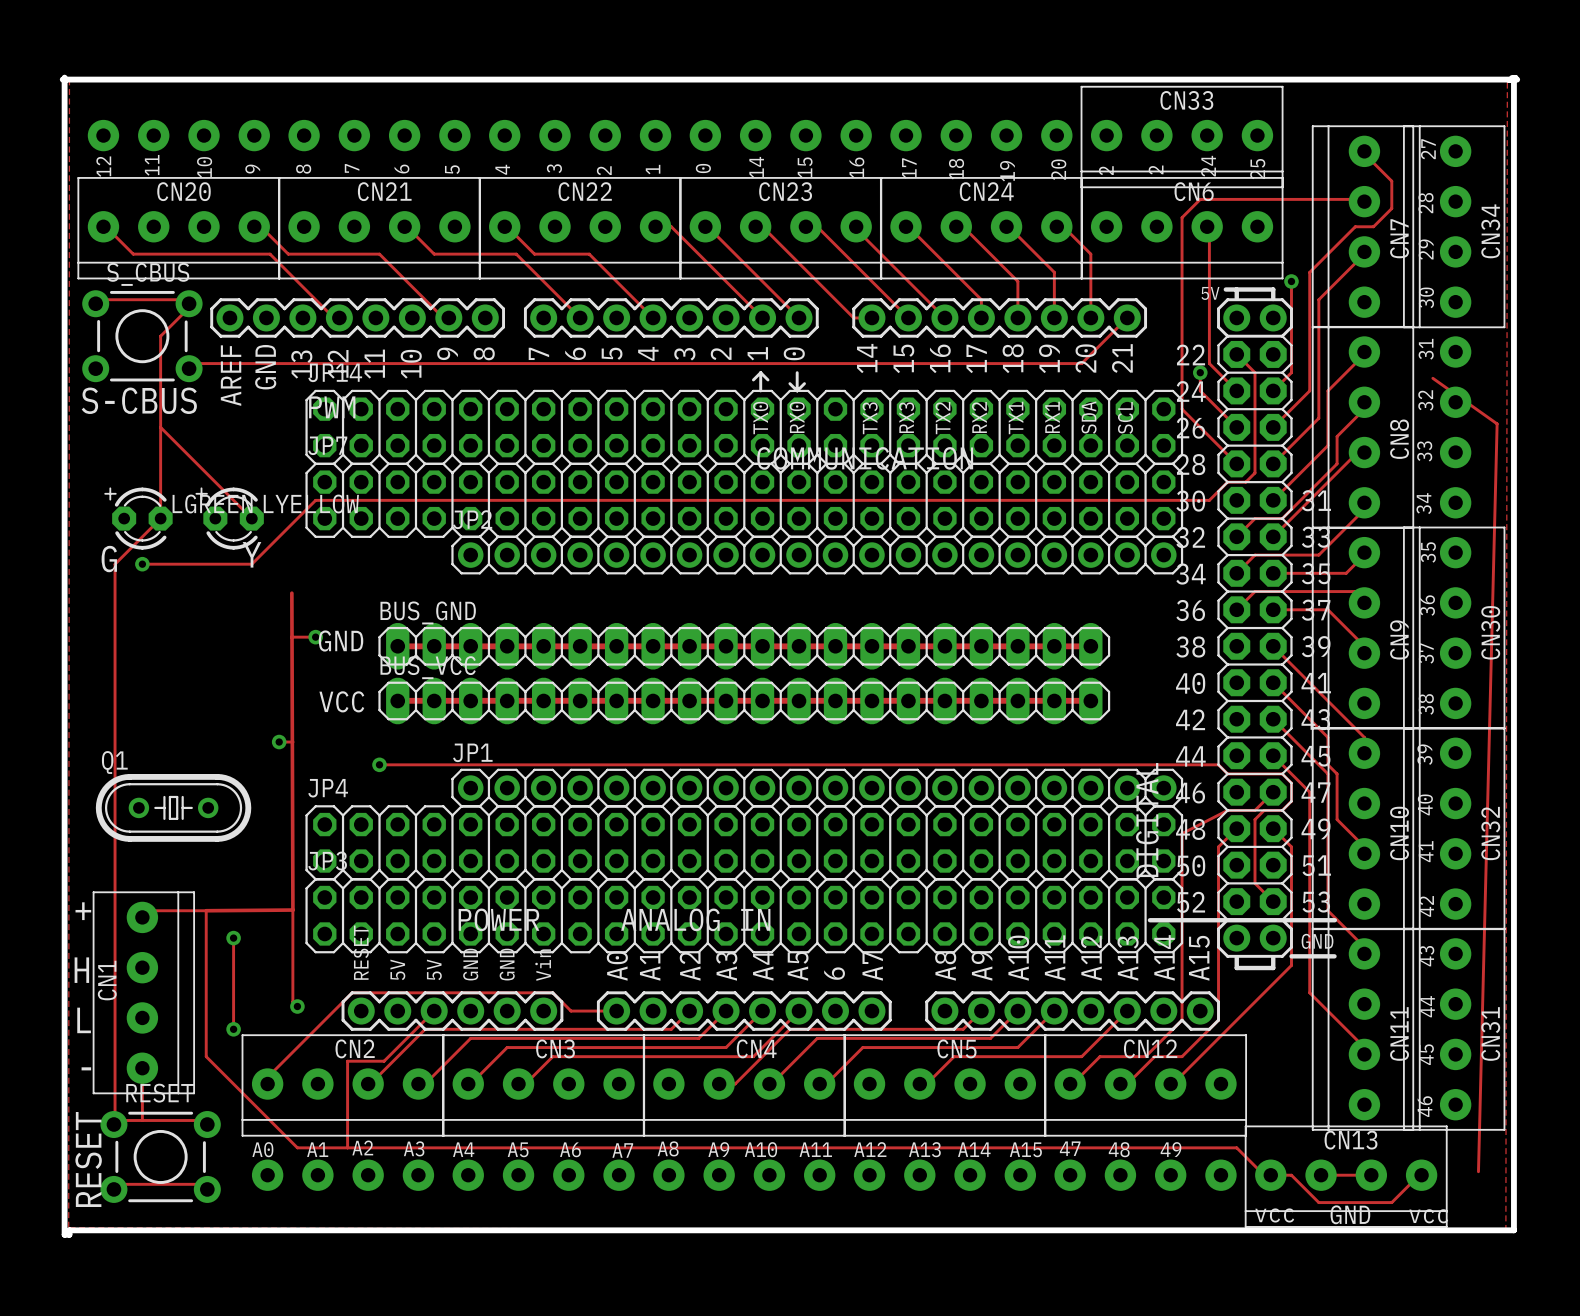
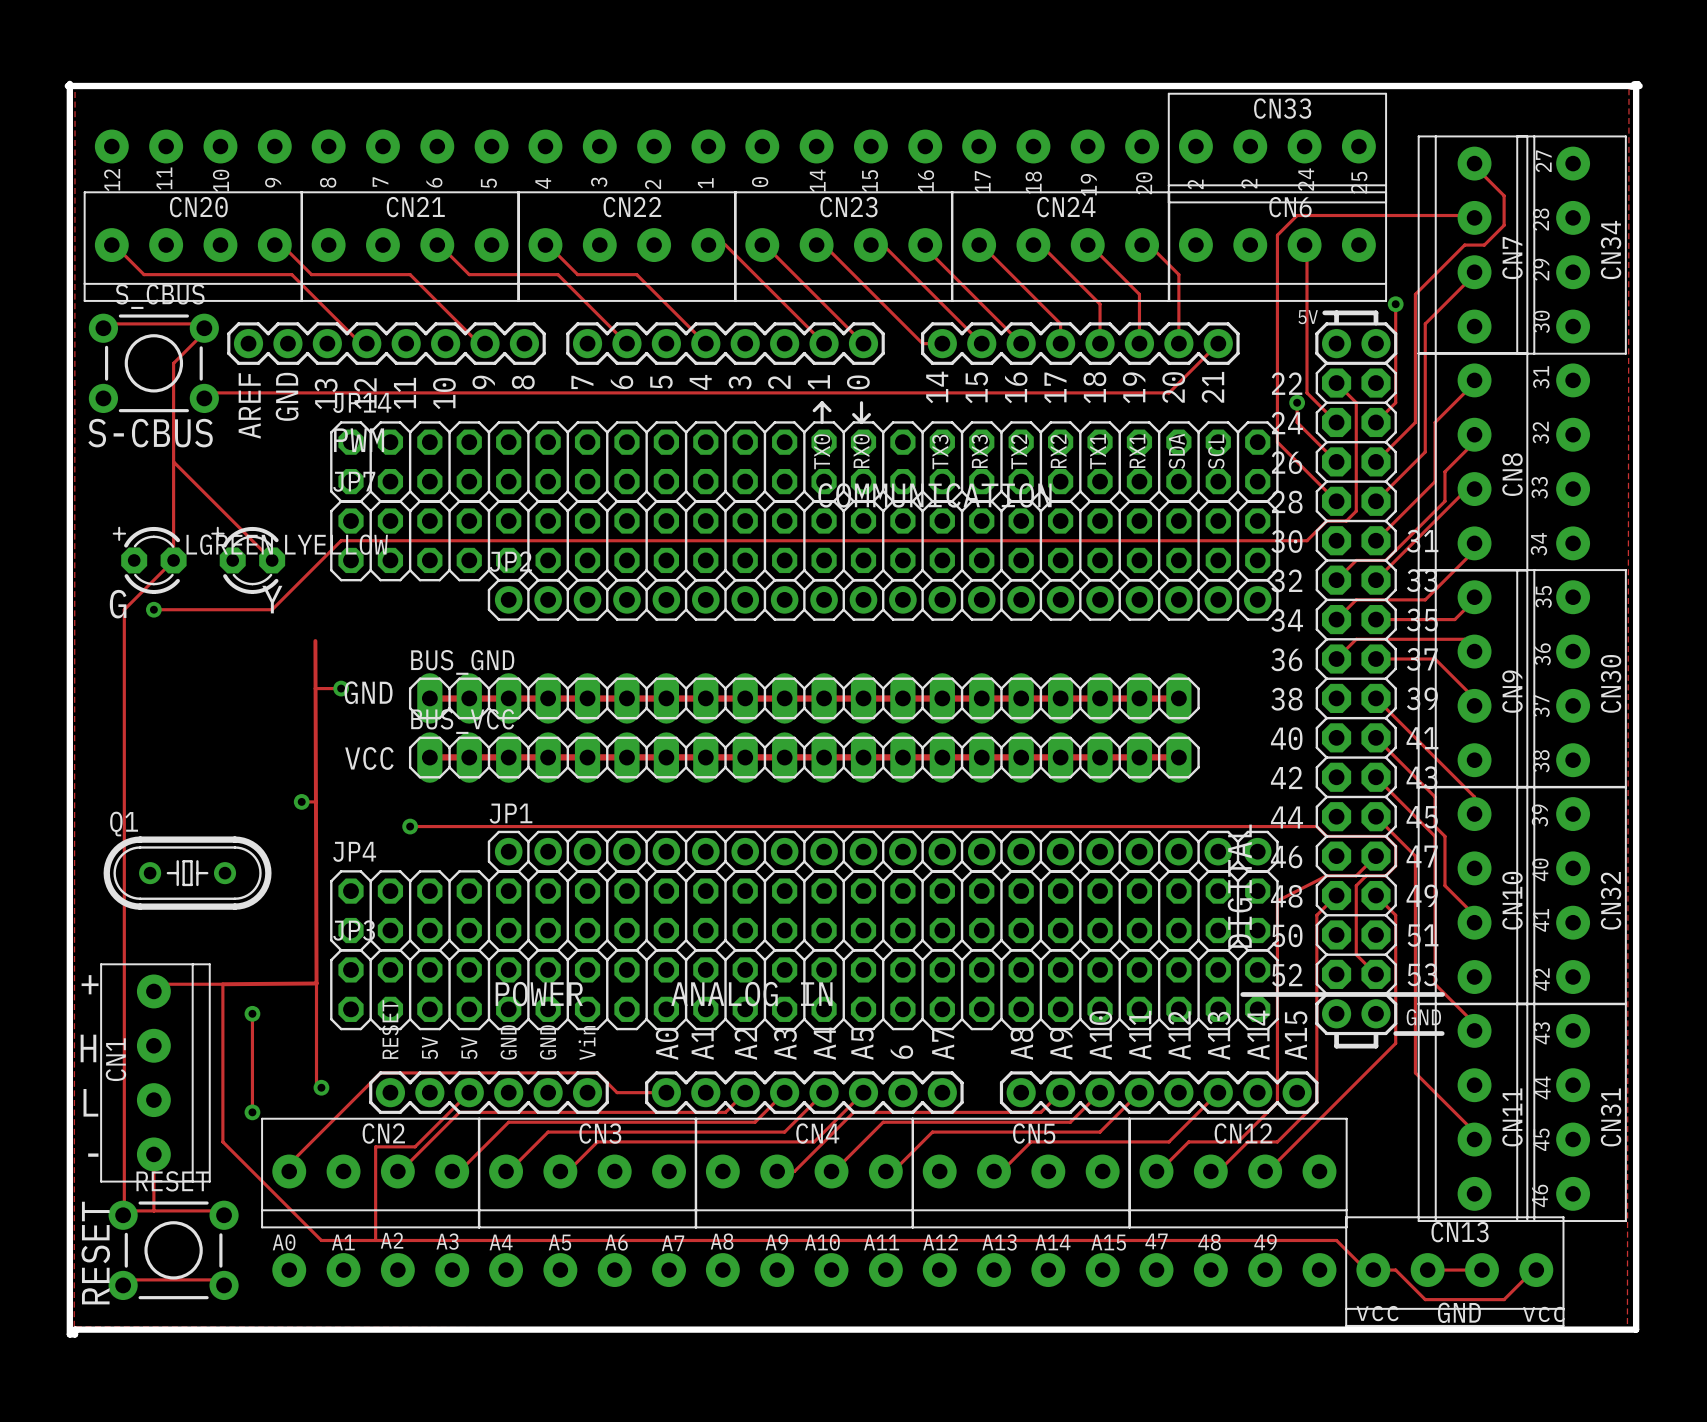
track: (1432, 378) (1497, 423) (1478, 1171) -> none

